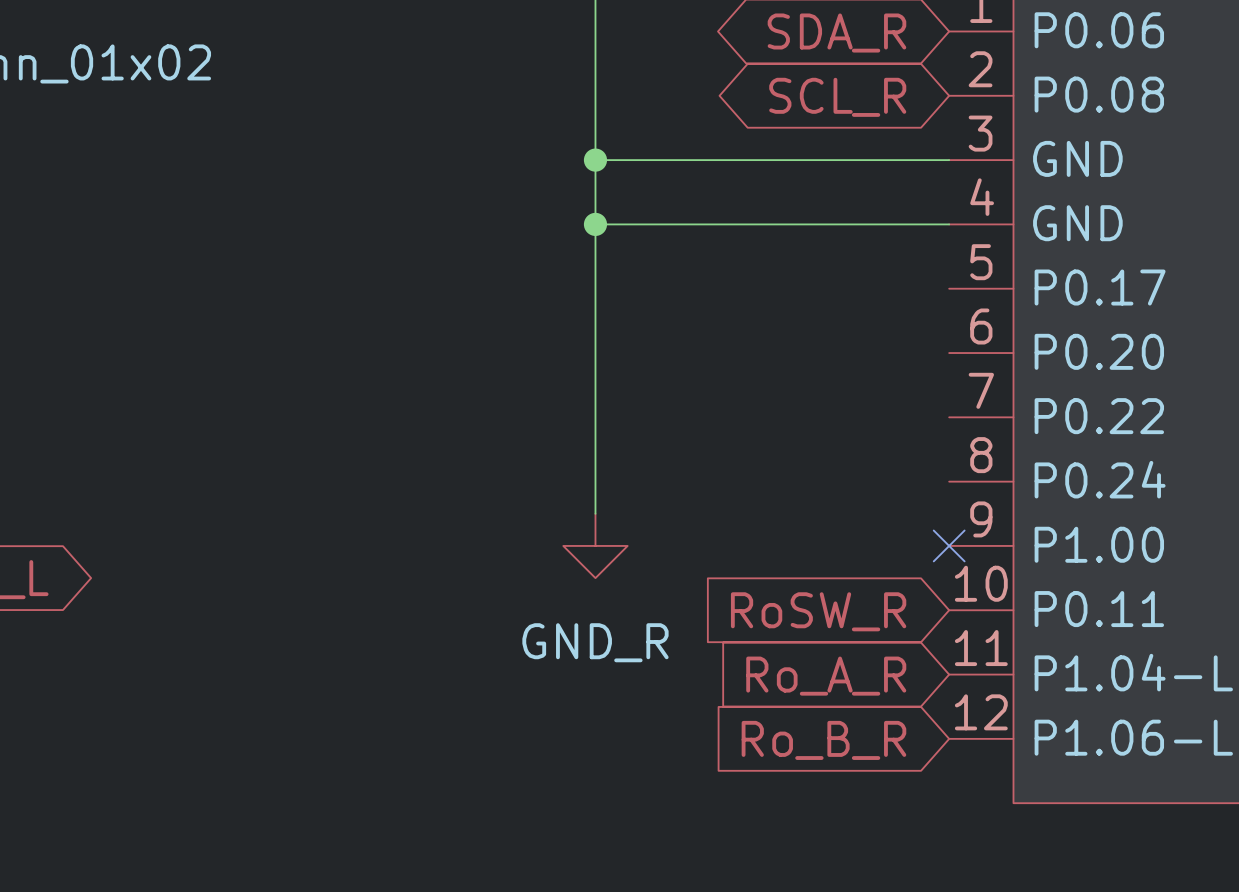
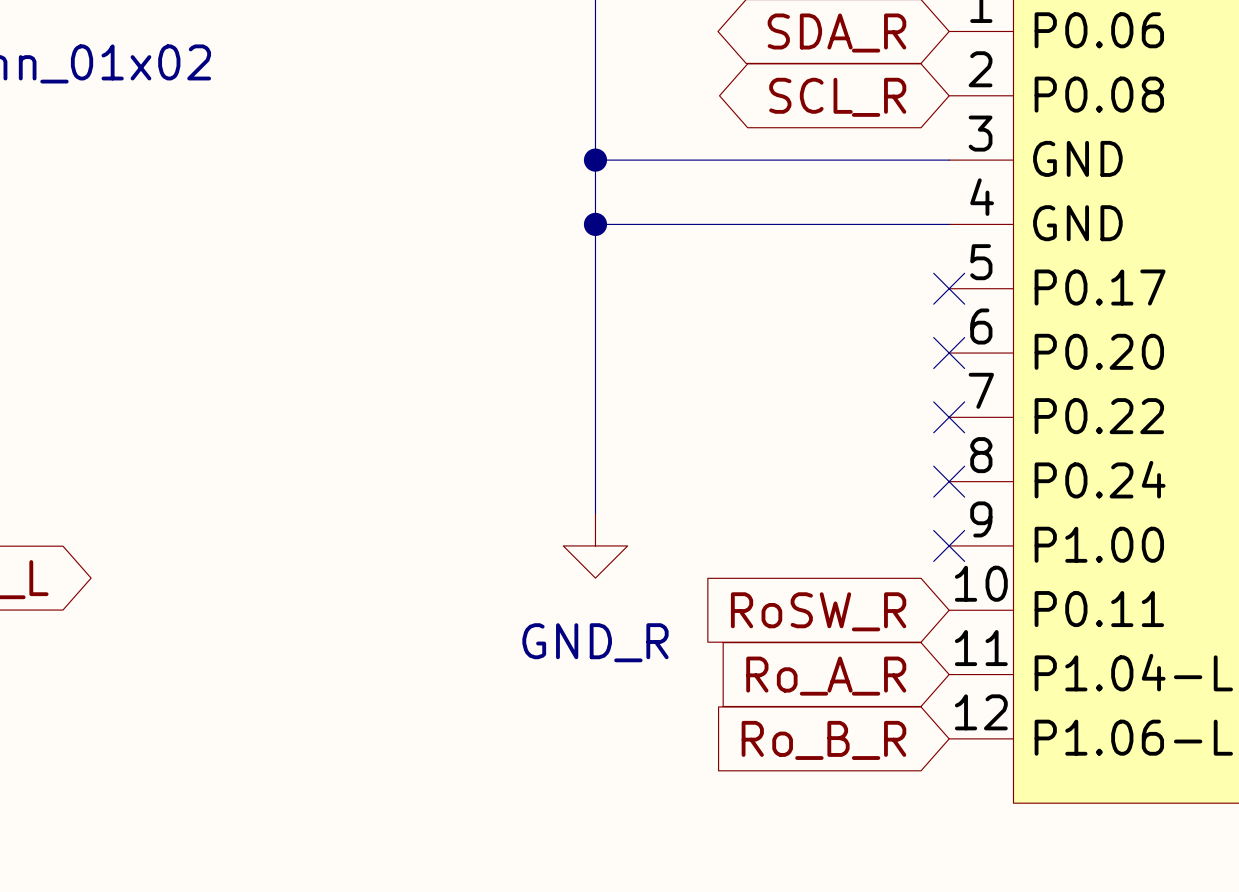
no-connect mark: none -> (949, 288)
no-connect mark: none -> (949, 353)
no-connect mark: none -> (949, 417)
no-connect mark: none -> (949, 481)

